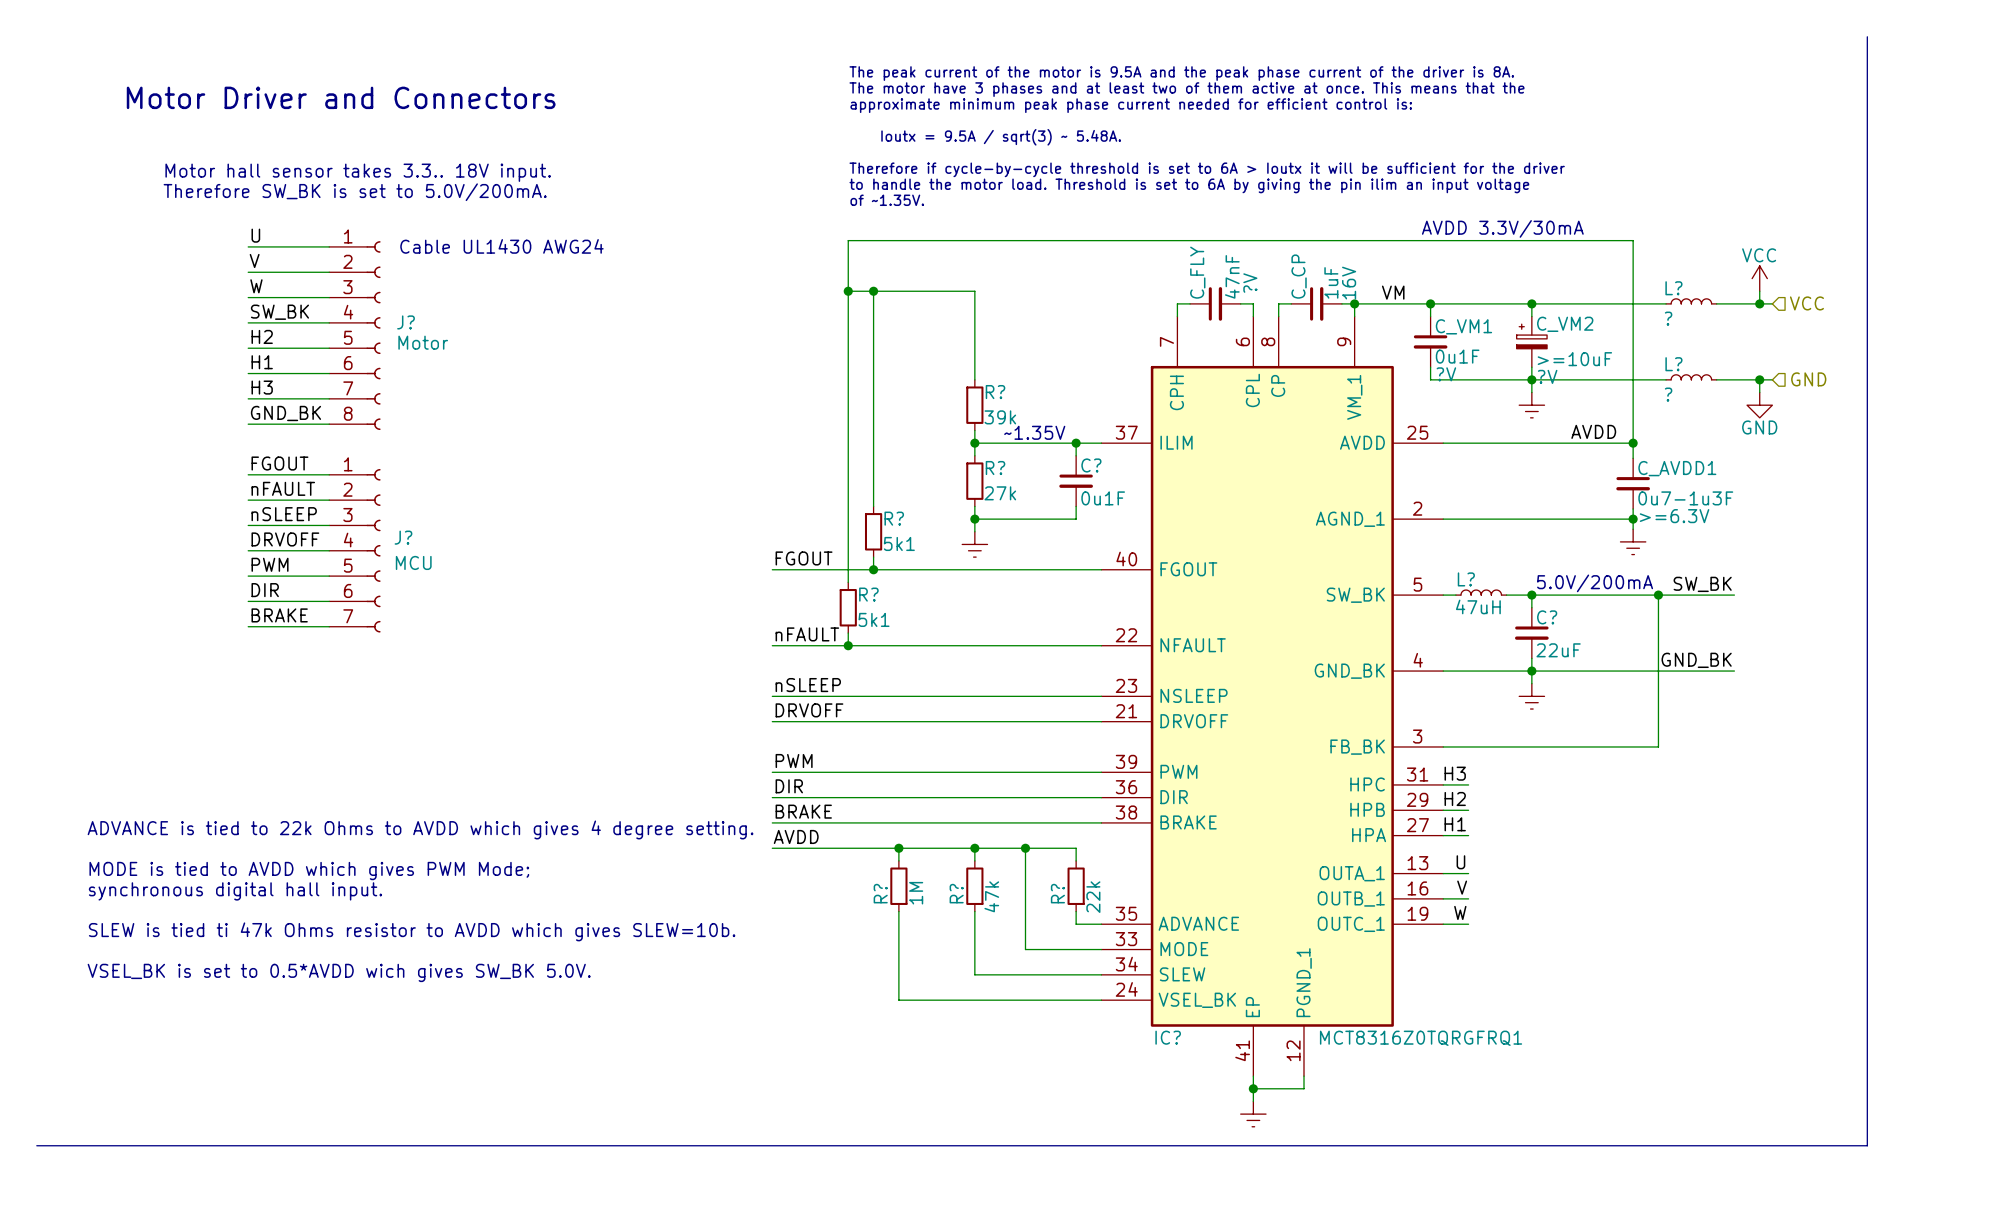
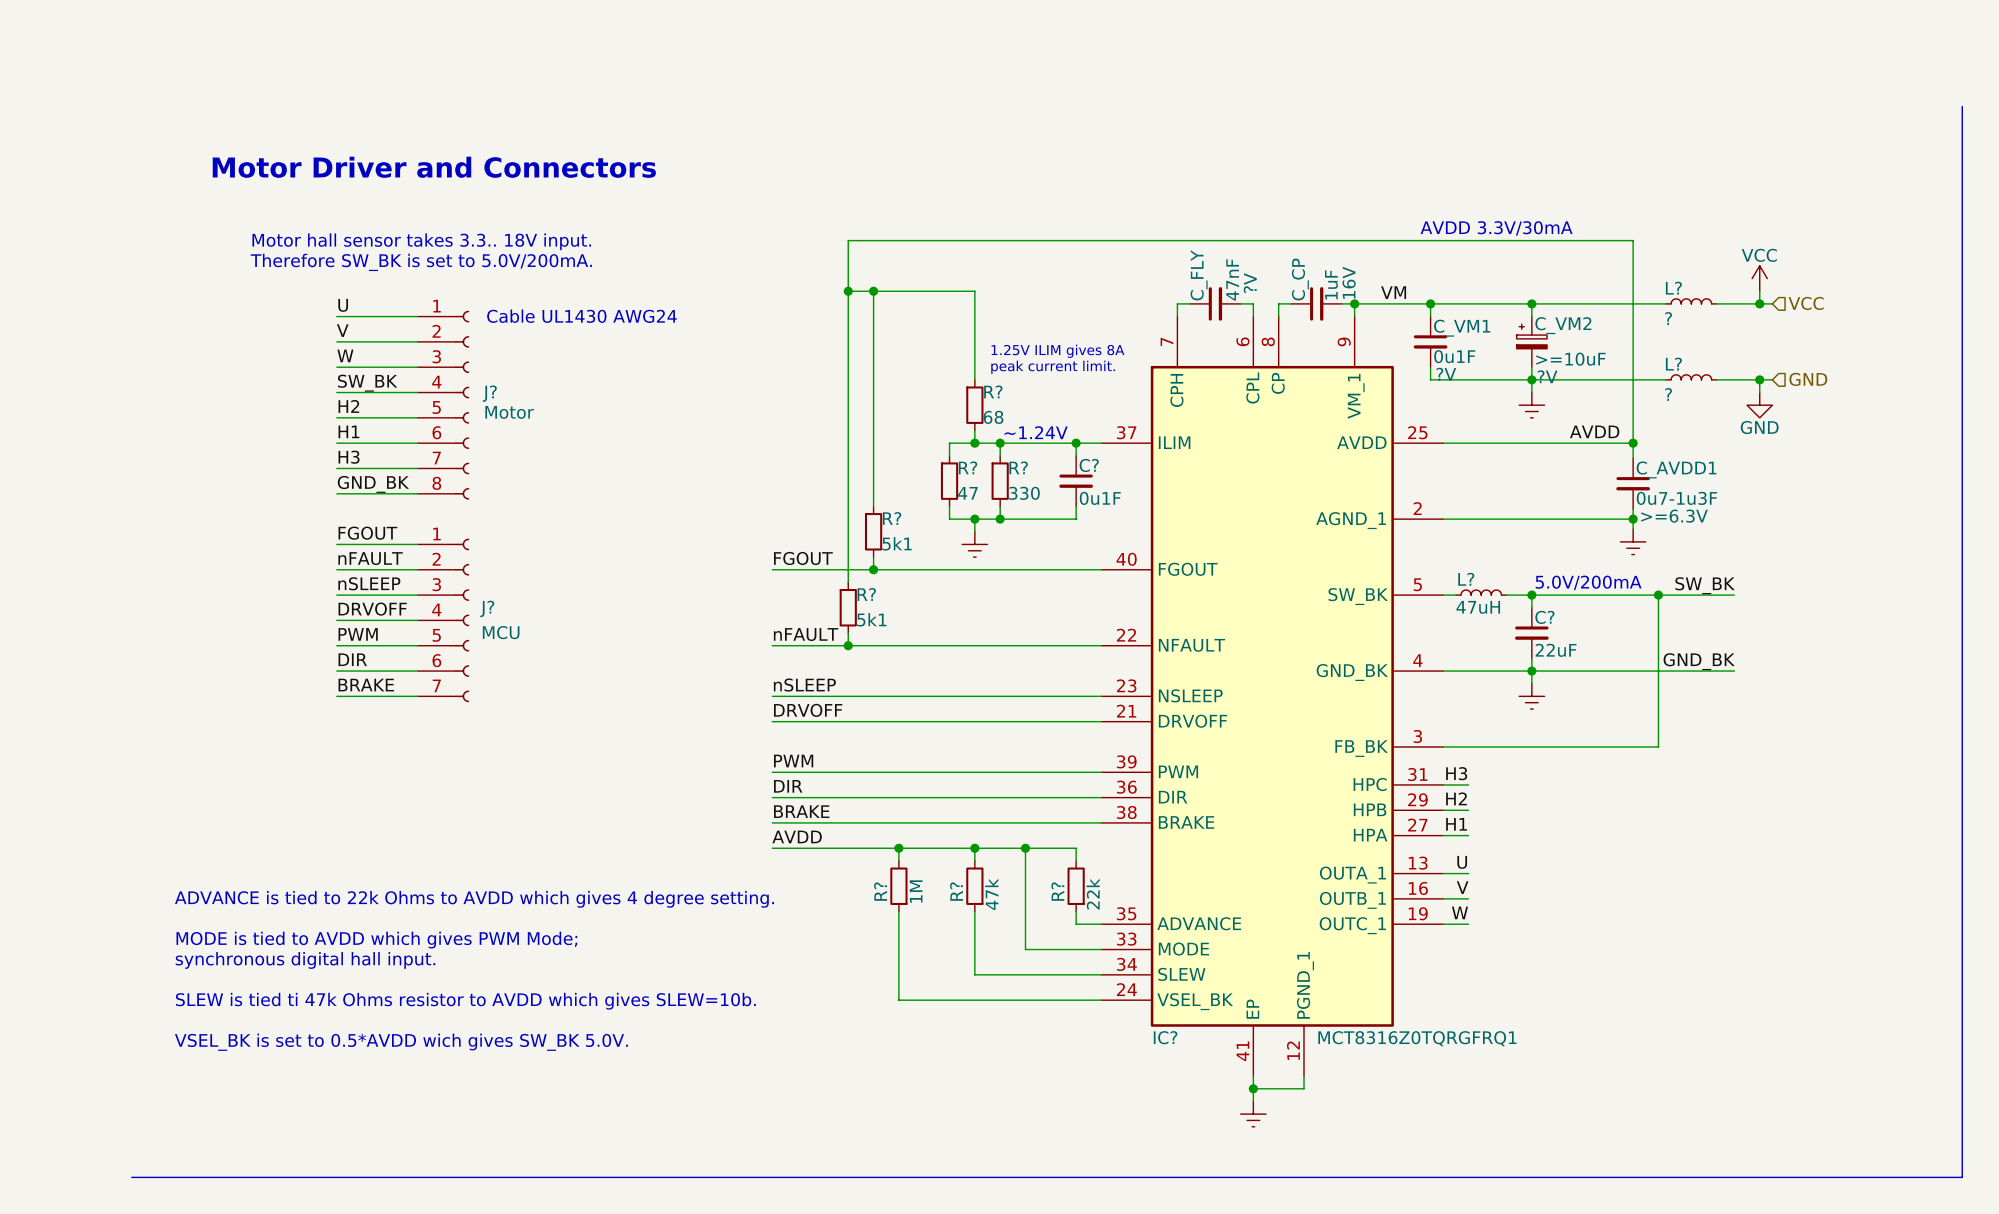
line: (1867, 36) (1867, 1145) (36, 1145) -> none
text: The peak current of the motor is 9.5A and the peak phase current of the driver is 8A. (1181, 73) -> none
text: The motor have 3 phases and at least two of them active at once. This means that the (1186, 89) -> none
text position: Motor Driver and Connectors (341, 97) -> Motor Driver and Connectors (434, 167)
text: approximate minimum peak phase current needed for efficient control is: (1131, 105) -> none
line: none -> (1962, 106) (1962, 1177) (131, 1177)
text: Ioutx = 9.5A / sqrt(3) ~ 5.48A. (1001, 137) -> none
text: Therefore if cycle-by-cycle threshold is set to 6A > Ioutx it will be sufficient for the driver (1207, 169) -> none
text position: Motor hall sensor takes 3.3.. 18V input. (358, 172) -> Motor hall sensor takes 3.3.. 18V input. (421, 241)
text: to handle the motor load. Threshold is set to 6A by giving the pin ilim an input voltage (1189, 185) -> none
text position: Therefore SW_BK is set to 5.0V/200mA. (355, 192) -> Therefore SW_BK is set to 5.0V/200mA. (421, 262)
text: of ~1.35V. (887, 200) -> none
label position: U (255, 235) -> U (343, 305)
wire: (248, 246) (329, 246) -> (336, 316) (417, 316)
text position: Cable UL1430 AWG24 (501, 246) -> Cable UL1430 AWG24 (581, 316)
label position: V (254, 260) -> V (342, 330)
wire: (248, 272) (329, 272) -> (336, 341) (417, 341)
label position: W (256, 286) -> W (345, 355)
wire: (248, 297) (329, 297) -> (336, 367) (417, 367)
label position: SW_BK (279, 312) -> SW_BK (367, 383)
wire: (248, 322) (329, 322) -> (336, 392) (417, 392)
J?: Motor (354, 335) -> none
label position: H2 (262, 336) -> H2 (348, 406)
wire: (248, 348) (329, 348) -> (336, 417) (417, 417)
text: none -> 1.25V ILIM gives 8A (1057, 351)
label position: H1 (262, 362) -> H1 (348, 431)
text: none -> peak current limit. (1053, 367)
wire: (248, 373) (329, 373) -> (336, 443) (417, 443)
label position: H3 (262, 387) -> H3 (349, 457)
wire: (248, 398) (329, 398) -> (336, 468) (417, 468)
J?: none -> Motor (443, 405)
label position: GND_BK (285, 413) -> GND_BK (373, 484)
R? value: 39k (1000, 417) -> 68 (993, 417)
wire: (248, 424) (329, 424) -> (336, 493) (417, 493)
text: ~1.35V (1034, 432) -> ~1.24V (1036, 432)
wire: (974, 443) (974, 455) -> (974, 443) (949, 443) (949, 455)
wire: none -> (1000, 443) (1000, 455)
junction: none -> (1000, 443)
label position: FGOUT (279, 463) -> FGOUT (367, 533)
wire: (248, 474) (329, 474) -> (336, 544) (417, 544)
R?: none -> 47 (949, 481)
R?: 27k (974, 481) -> none
R?: none -> 330 (1000, 481)
label position: nFAULT (283, 488) -> nFAULT (370, 558)
wire: (248, 500) (329, 500) -> (336, 569) (417, 569)
wire: (974, 506) (974, 519) -> (949, 506) (949, 519) (974, 519)
wire: none -> (1000, 506) (1000, 519)
label position: nSLEEP (284, 514) -> nSLEEP (369, 583)
junction: none -> (1000, 519)
wire: (248, 525) (329, 525) -> (336, 595) (417, 595)
label position: DRVOFF (285, 539) -> DRVOFF (372, 609)
wire: (248, 550) (329, 550) -> (336, 620) (417, 620)
J? position: (354, 550) -> (443, 620)
label position: PWM (270, 564) -> PWM (358, 634)
wire: (248, 576) (329, 576) -> (336, 645) (417, 645)
label position: DIR (265, 590) -> DIR (352, 659)
wire: (248, 601) (329, 601) -> (336, 671) (417, 671)
label position: BRAKE (279, 615) -> BRAKE (366, 685)
wire: (248, 626) (329, 626) -> (336, 696) (417, 696)
text position: ADVANCE is tied to 22k Ohms to AVDD which gives 4 degree setting. (420, 829) -> ADVANCE is tied to 22k Ohms to AVDD which gives 4 degree setting. (474, 899)
text position: MODE is tied to AVDD which gives PWM Mode; (309, 871) -> MODE is tied to AVDD which gives PWM Mode; (376, 940)
text position: synchronous digital hall input. (235, 891) -> synchronous digital hall input. (305, 960)
text position: SLEW is tied ti 47k Ohms resistor to AVDD which gives SLEW=10b. (412, 931) -> SLEW is tied ti 47k Ohms resistor to AVDD which gives SLEW=10b. (465, 1001)
text position: VSEL_BK is set to 0.5*AVDD wich gives SW_BK 5.0V. (339, 972) -> VSEL_BK is set to 0.5*AVDD wich gives SW_BK 5.0V. (401, 1042)

